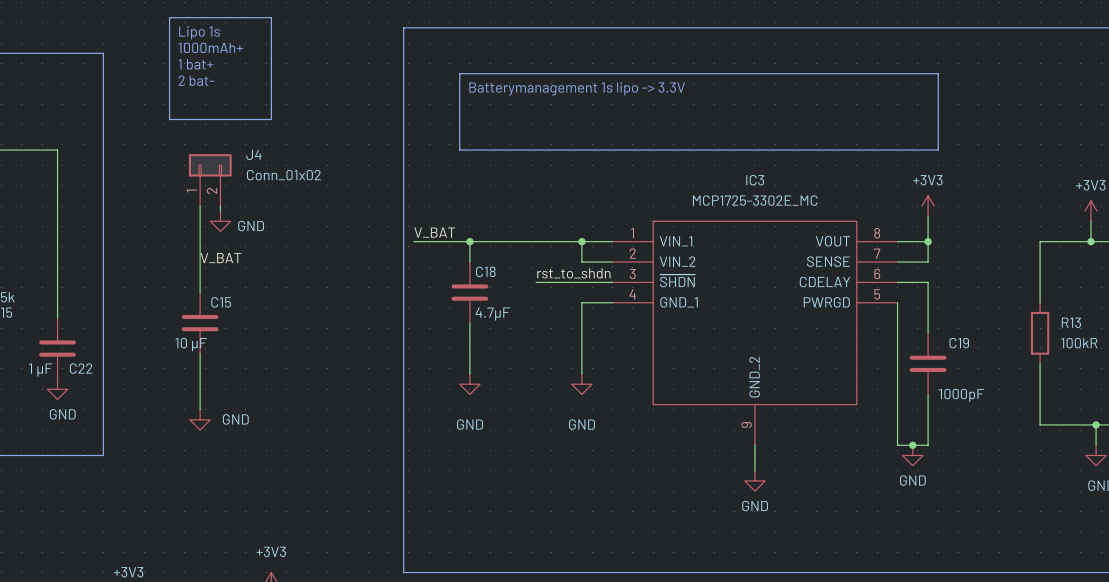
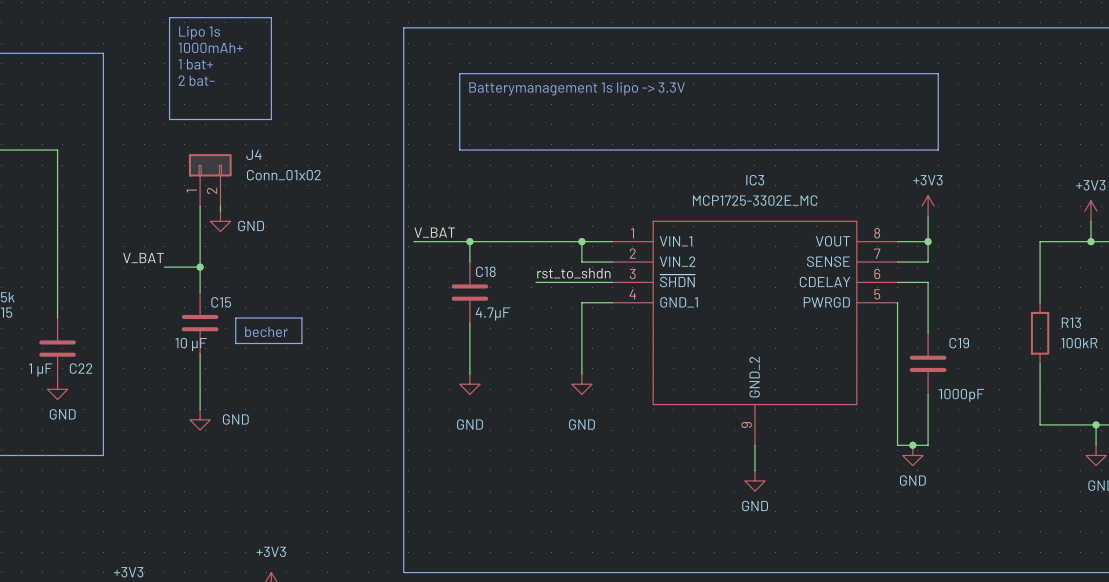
label position: V_BAT (220, 258) -> V_BAT (143, 258)
wire: none -> (164, 267) (200, 267)
junction: none -> (200, 267)
line: none -> (235, 318) (301, 318) (301, 343) (235, 343) (235, 318)
text: none -> becher (266, 331)

